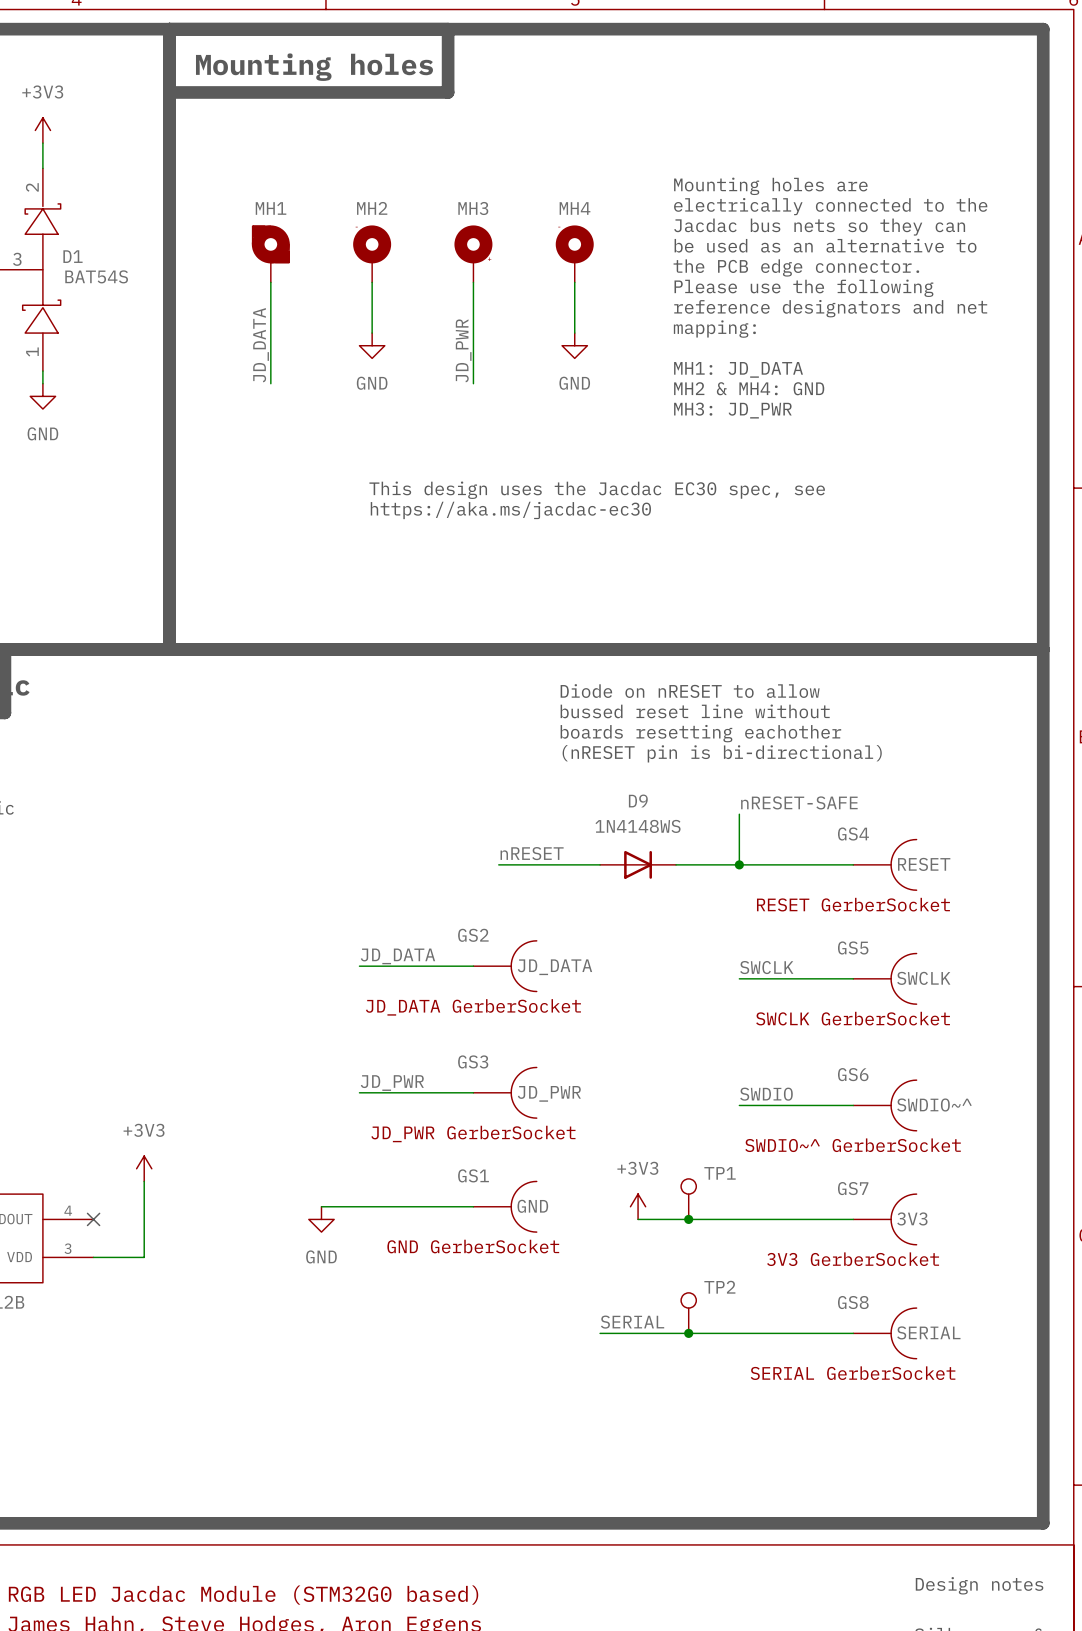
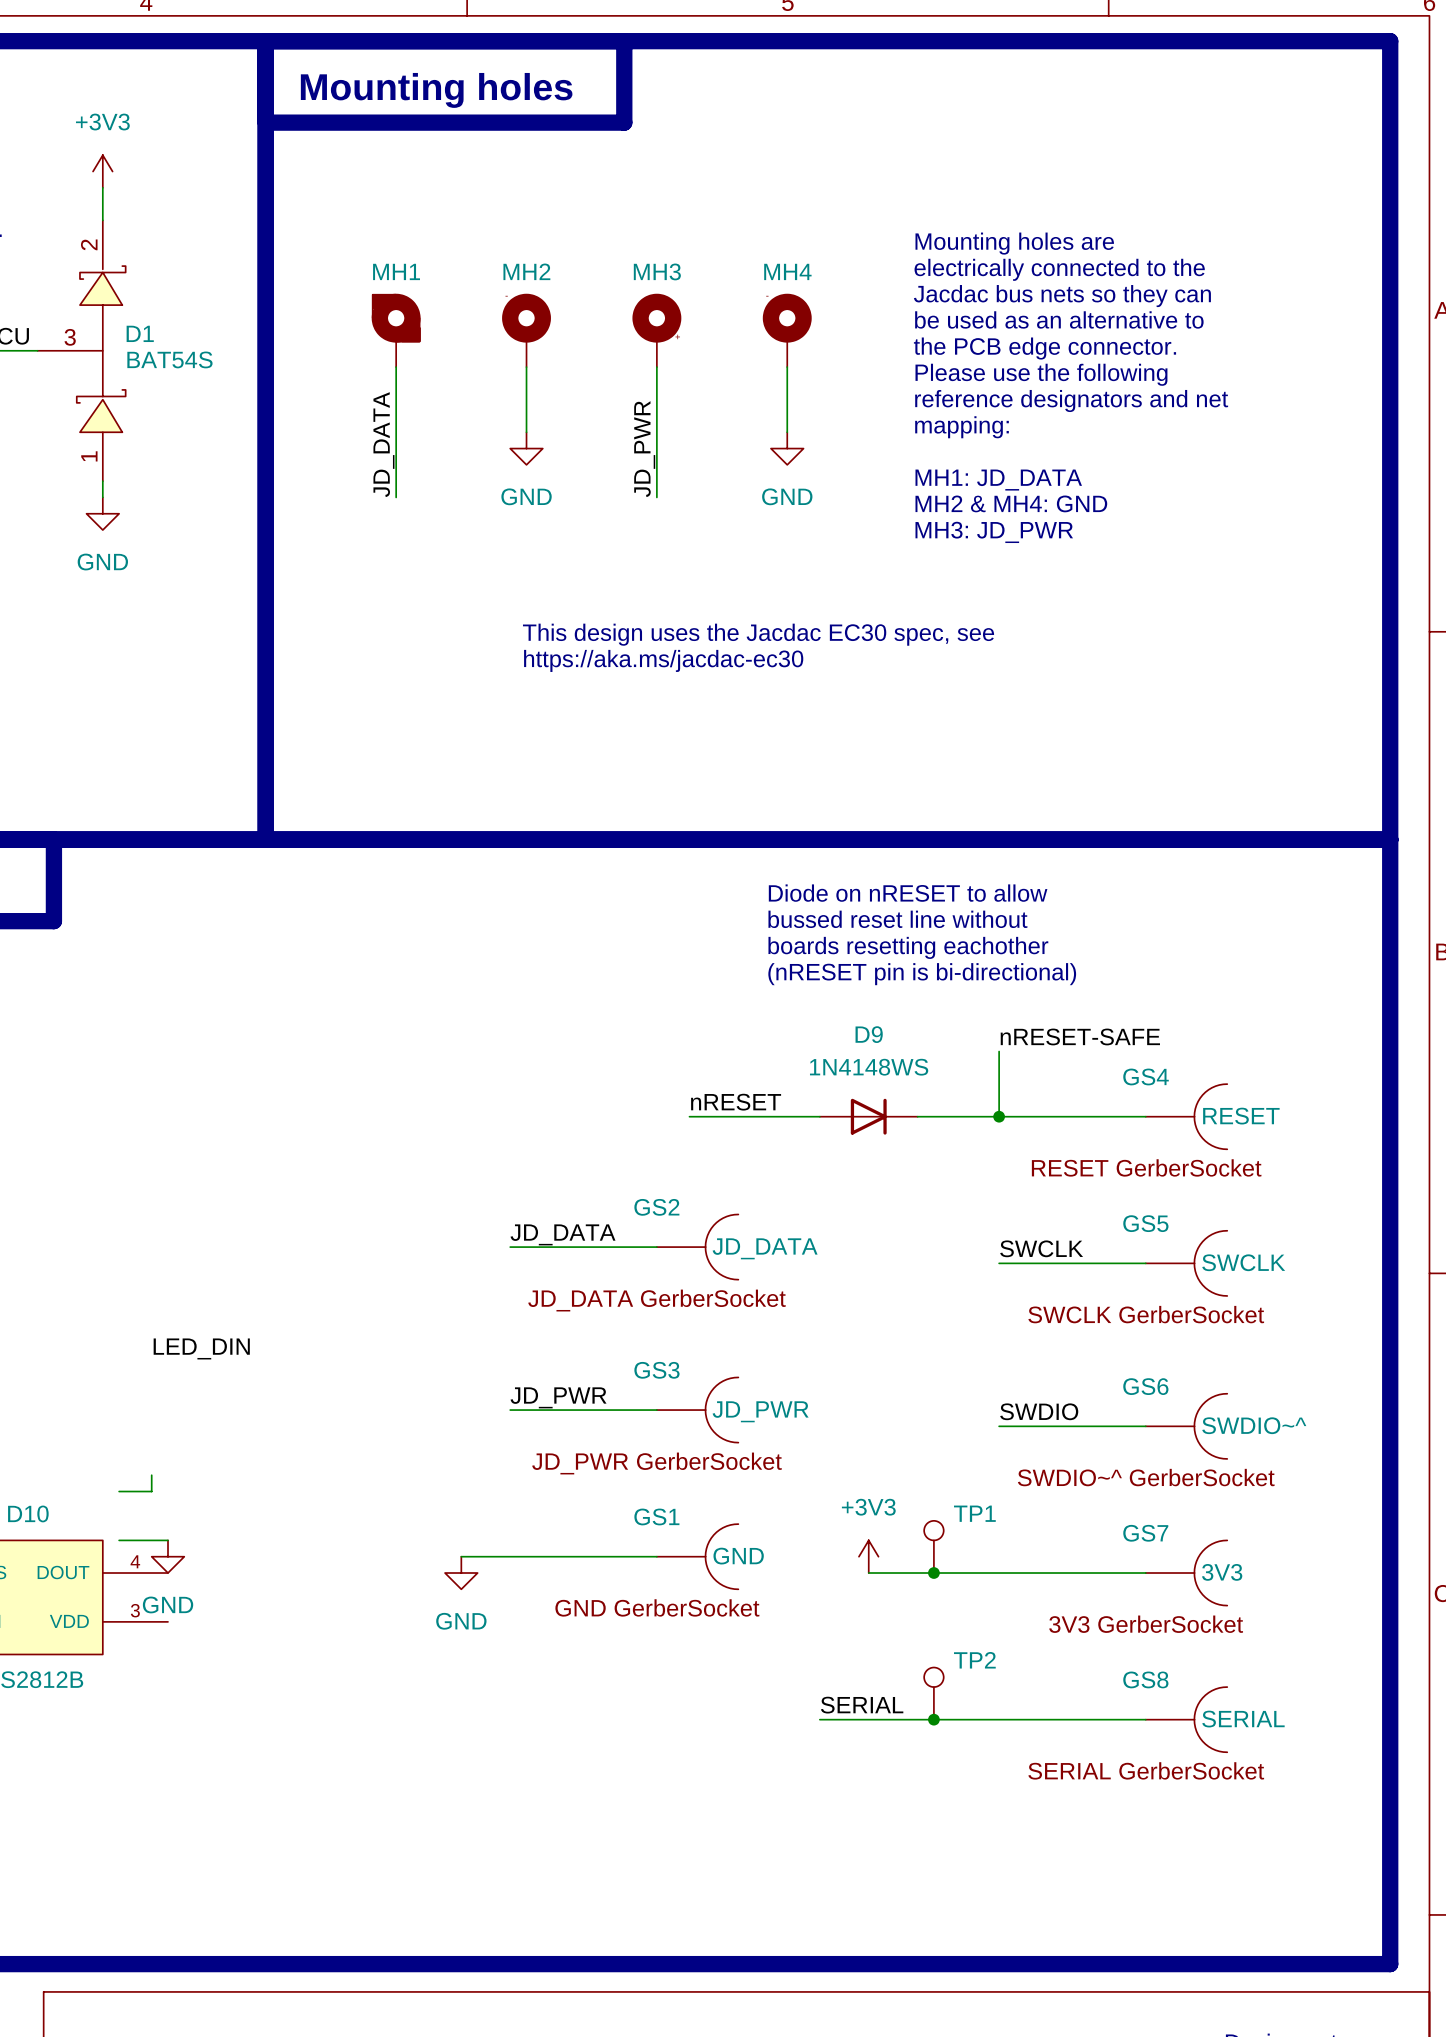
label: none -> LED_DIN (201, 1348)
wire: none -> (151, 1475) (151, 1491) (119, 1491)
power symbol: +3V3 (144, 1168) -> none
wire: (144, 1181) (144, 1257) (93, 1257) -> none
wire: none -> (119, 1540) (168, 1540)
power symbol: none -> GND (168, 1556)
no-connect mark: (93, 1219) -> none

